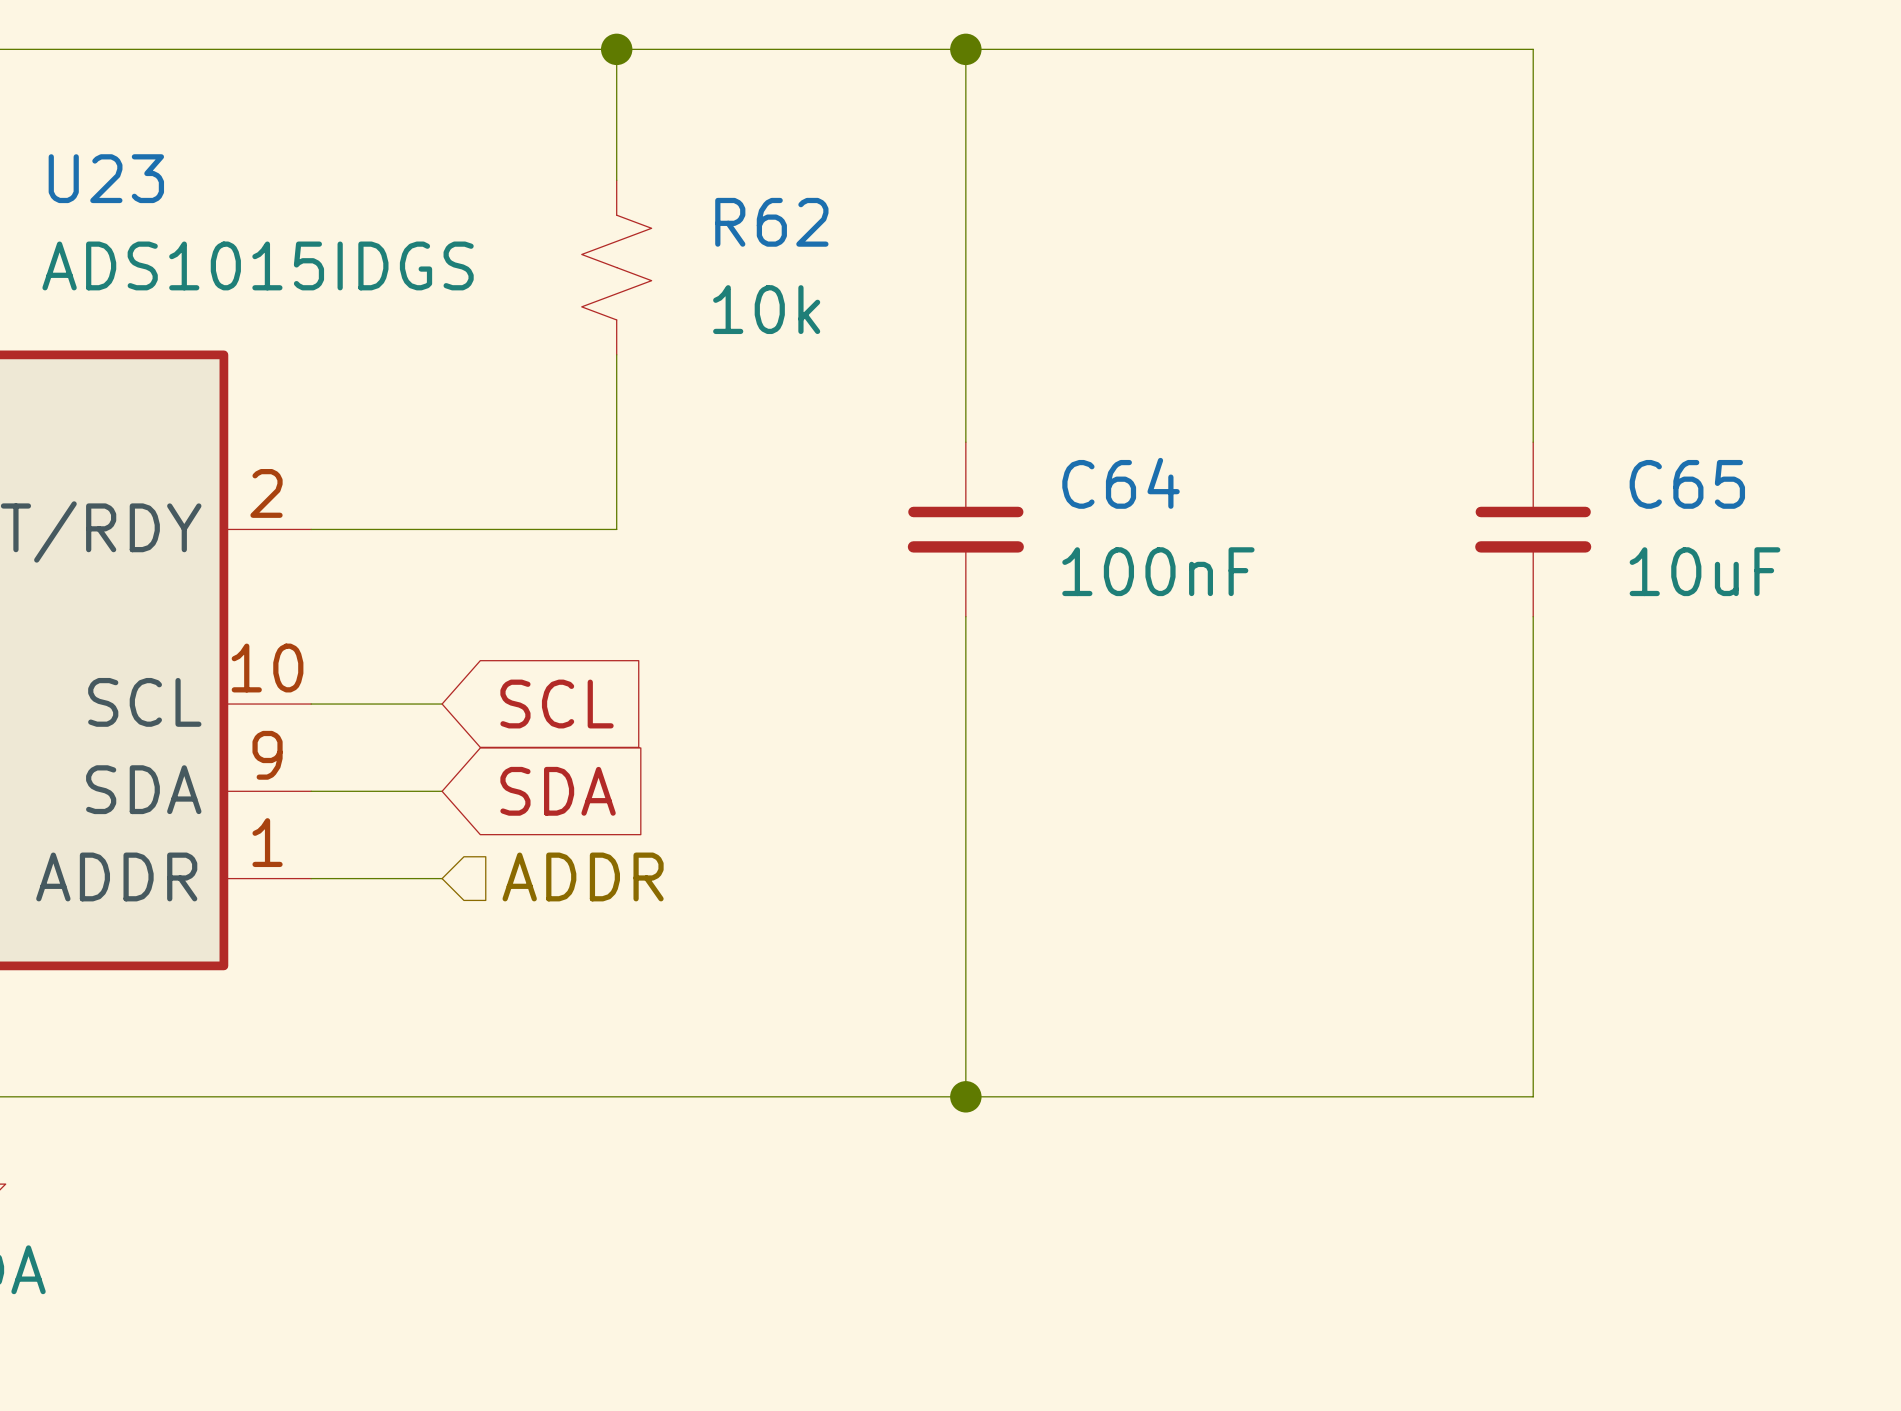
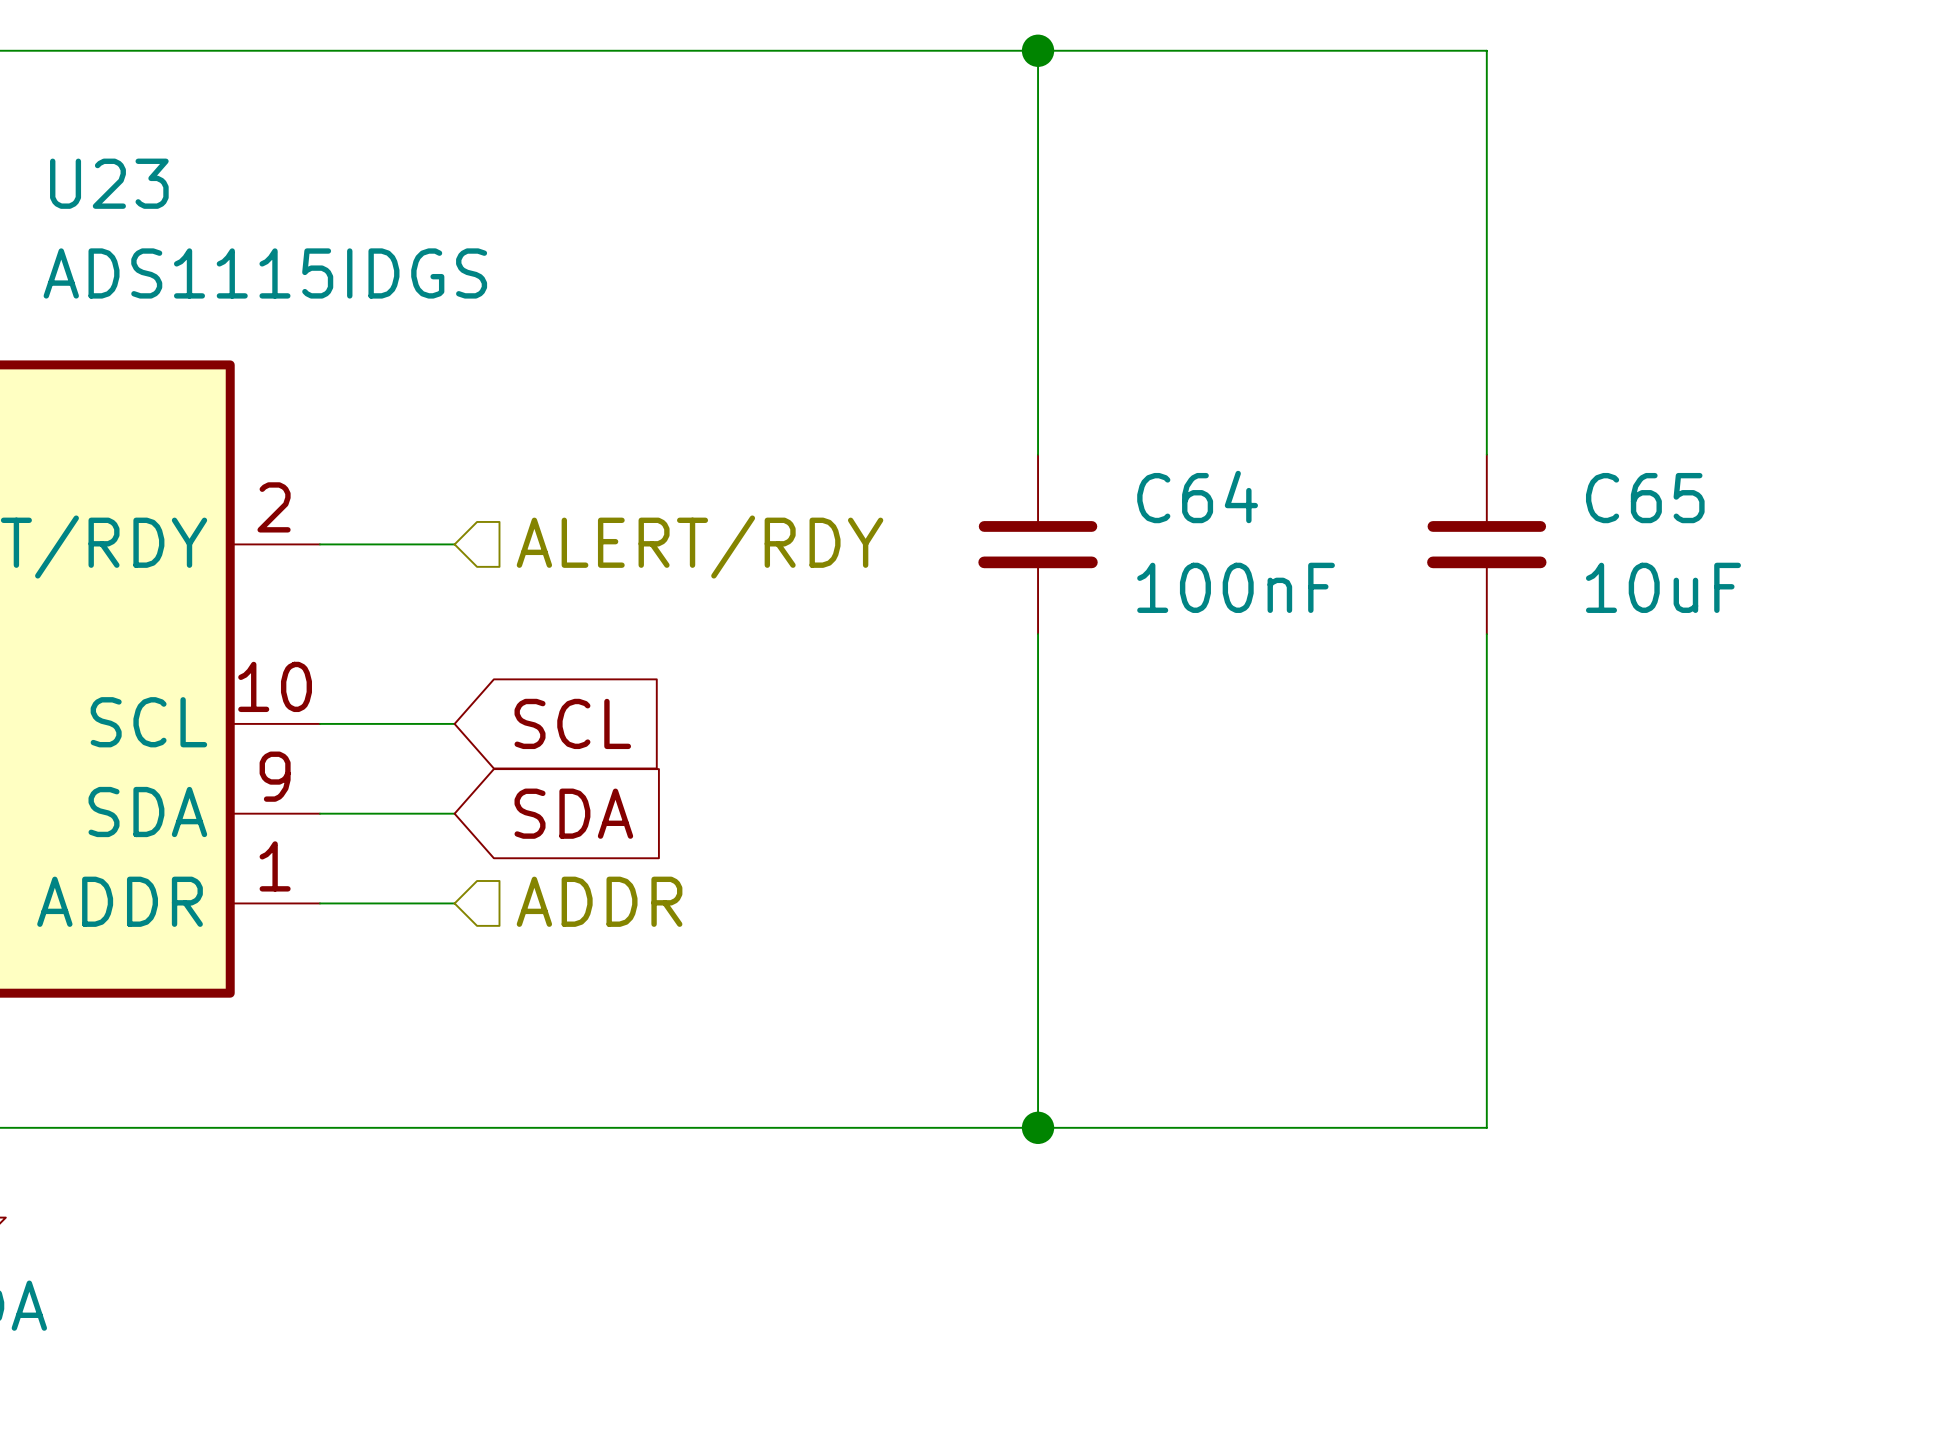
wire: (616, 49) (616, 180) -> none
junction: (616, 49) -> none
wire: (965, 49) (965, 442) -> (1038, 50) (1038, 454)
junction position: (965, 49) -> (1038, 50)
wire: (1445, 49) (1533, 49) (1533, 442) -> (1486, 50) (1486, 454)
U23 value: ADS1015IDGS (258, 265) -> ADS1115IDGS (265, 273)
R62: 10k (616, 267) -> none
wire: (616, 354) (616, 529) (442, 529) -> none
C64 position: (965, 529) -> (1038, 544)
C65 position: (1533, 529) -> (1486, 544)
hierarchical label: none -> ALERT/RDY (700, 547)
wire: (965, 616) (965, 1096) -> (1038, 634) (1038, 1127)
wire: (1533, 616) (1533, 1096) (1445, 1096) -> (1486, 634) (1486, 1127)
junction position: (965, 1096) -> (1038, 1127)

